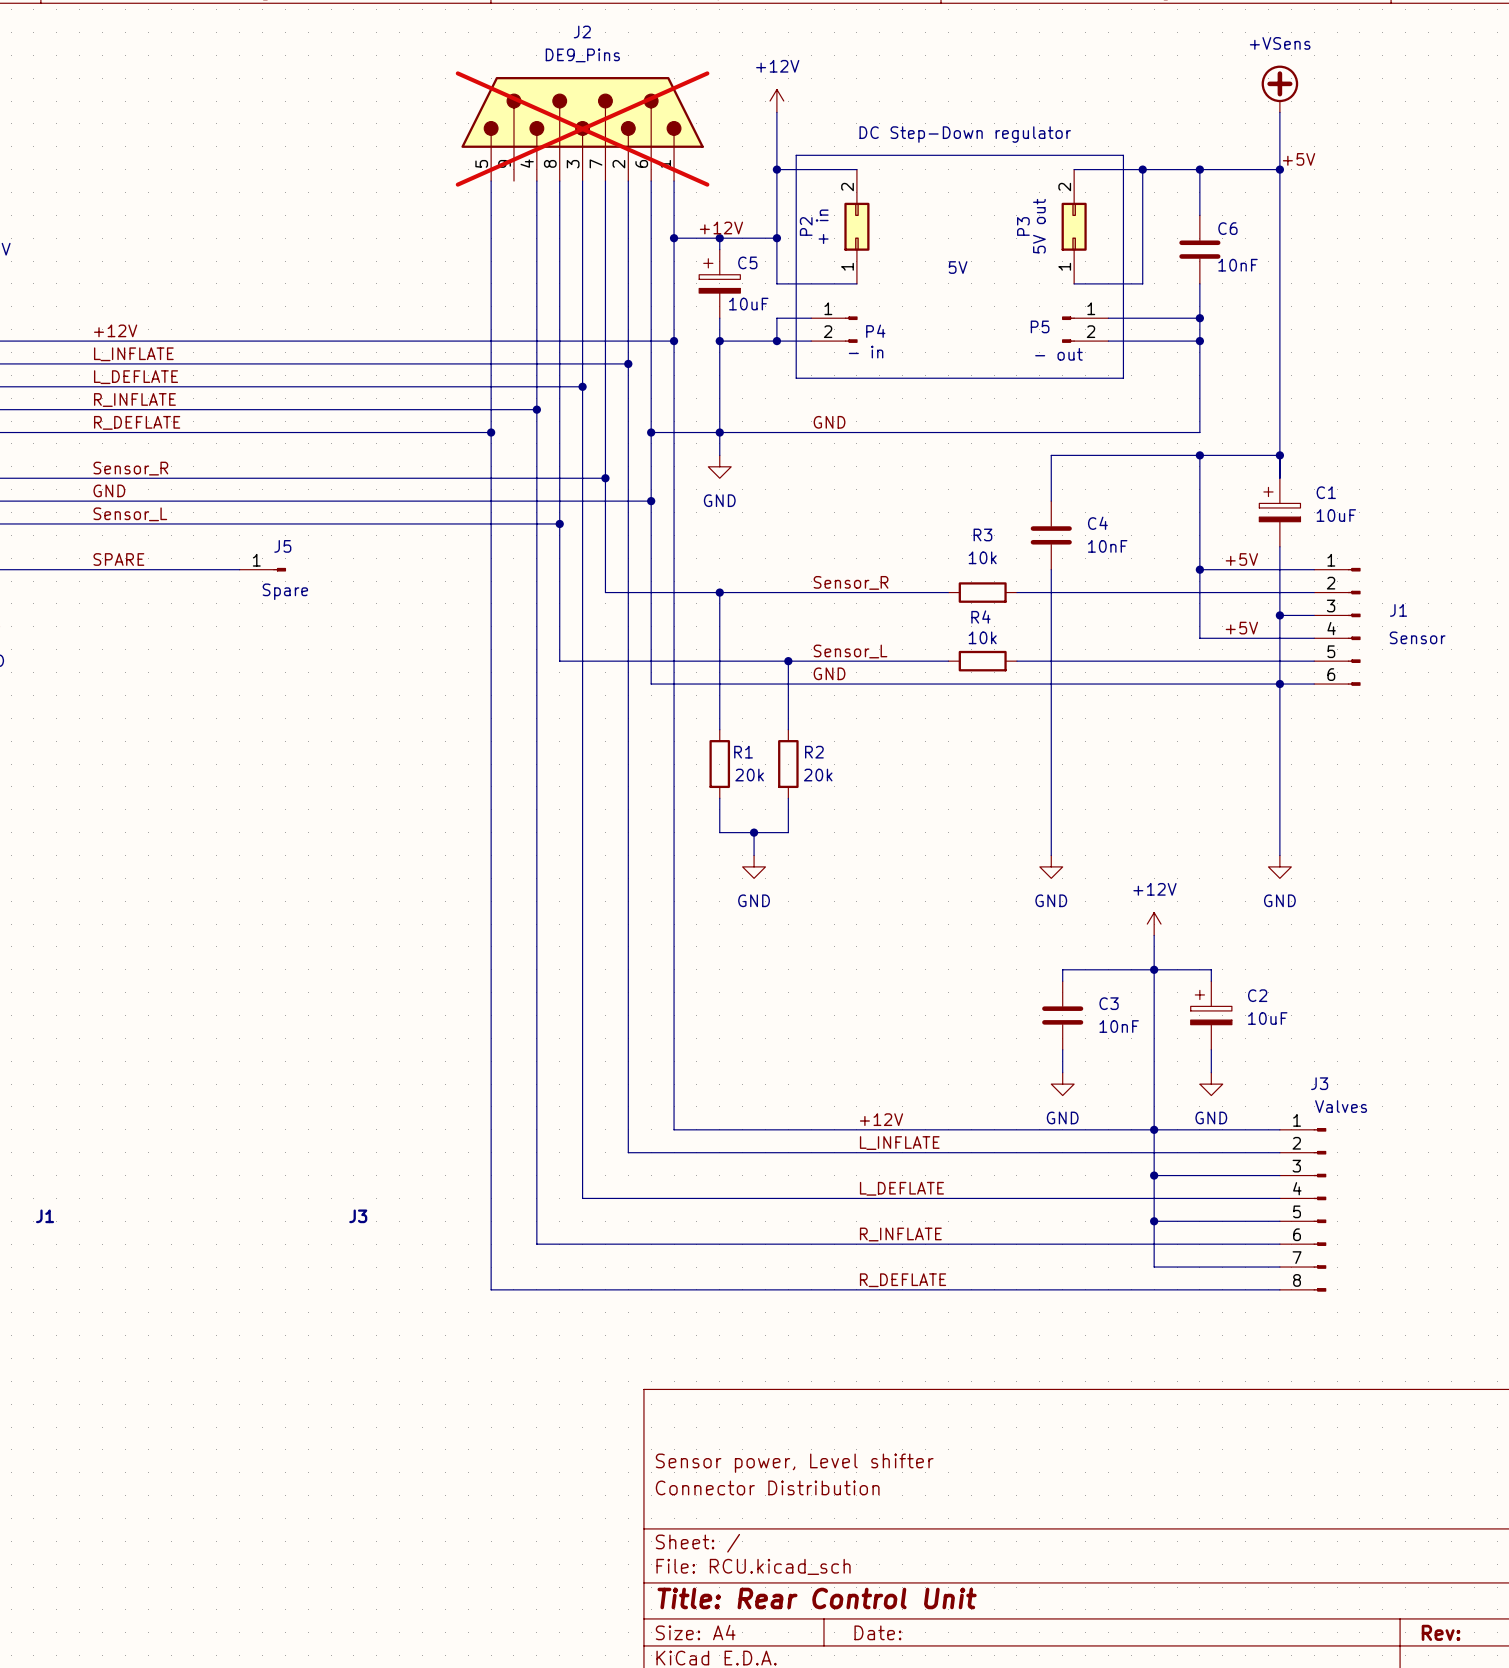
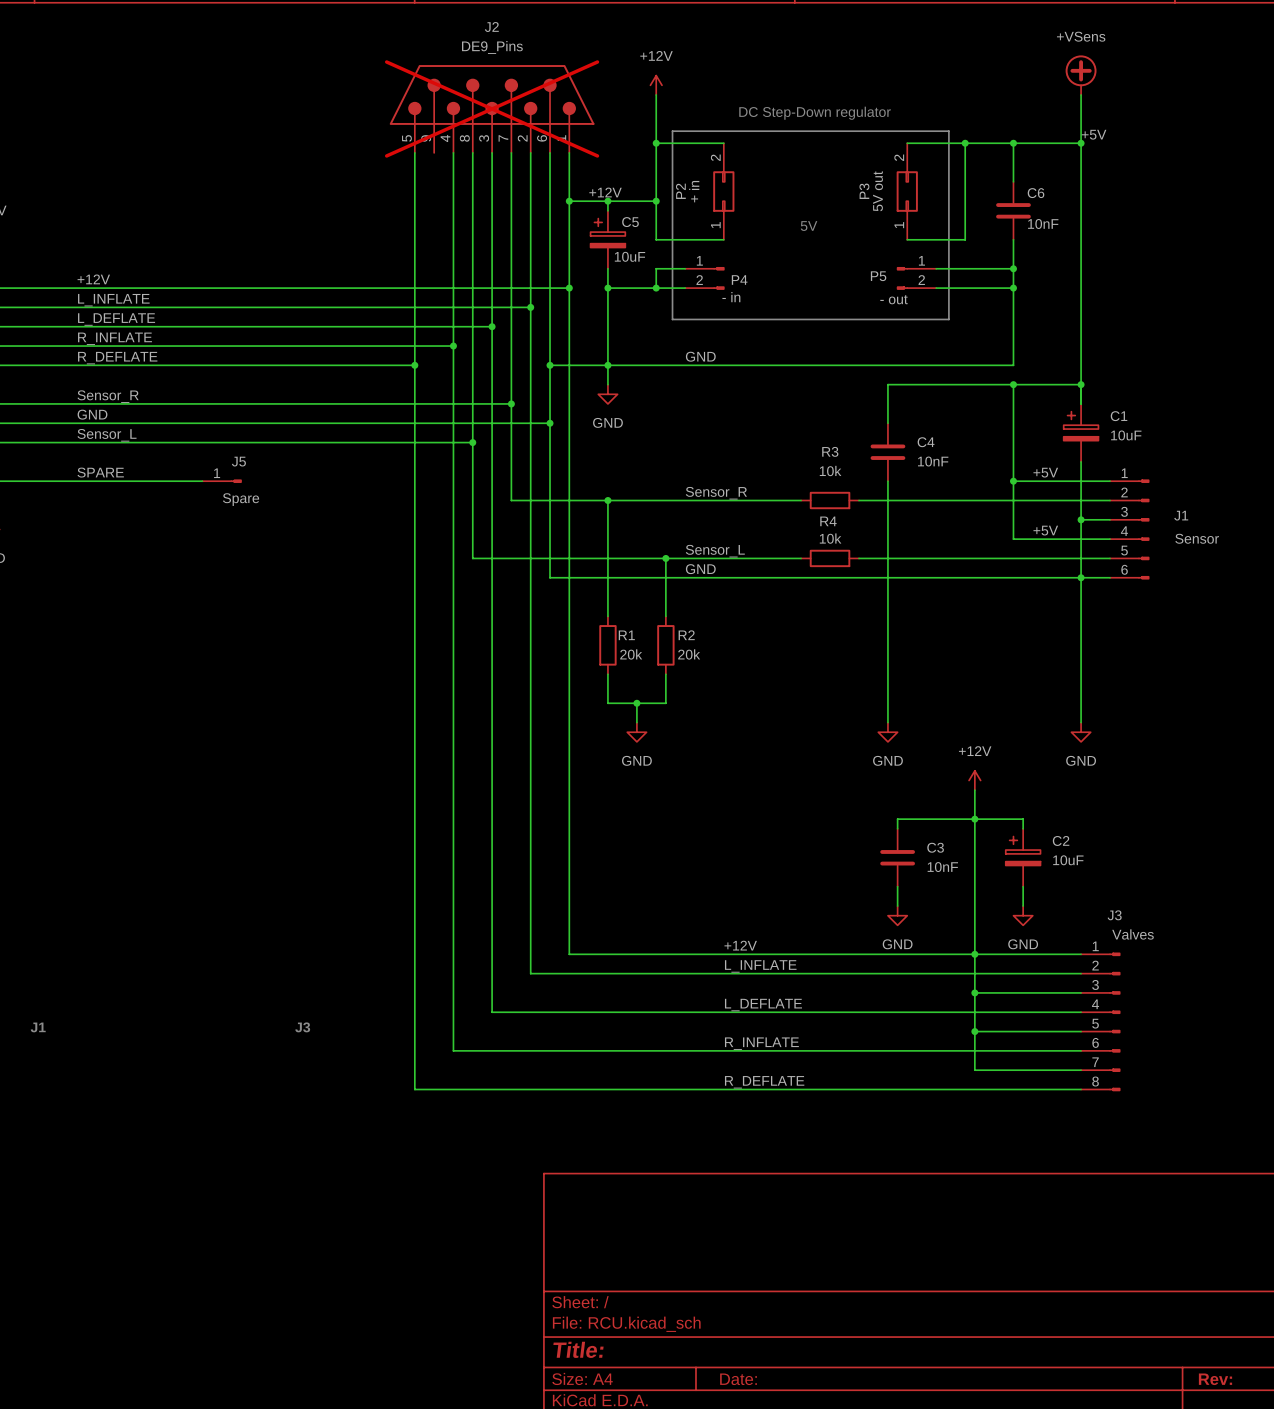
title block: Sensor power, Level shifter (794, 1463) -> none
title block: Connector Distribution (767, 1487) -> none
title block: Title: Rear Control Unit (817, 1598) -> Title: (578, 1349)

